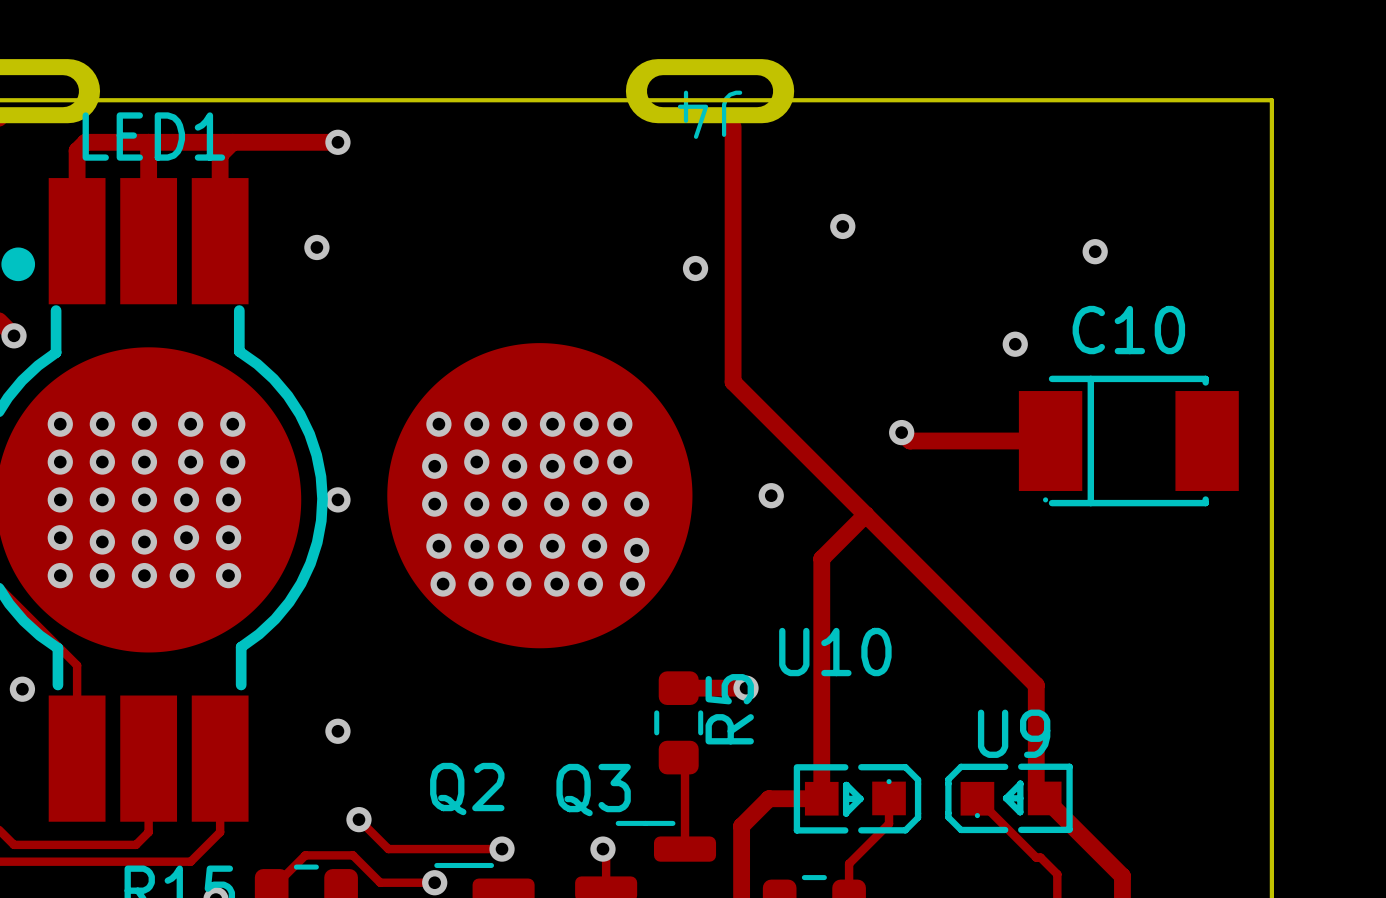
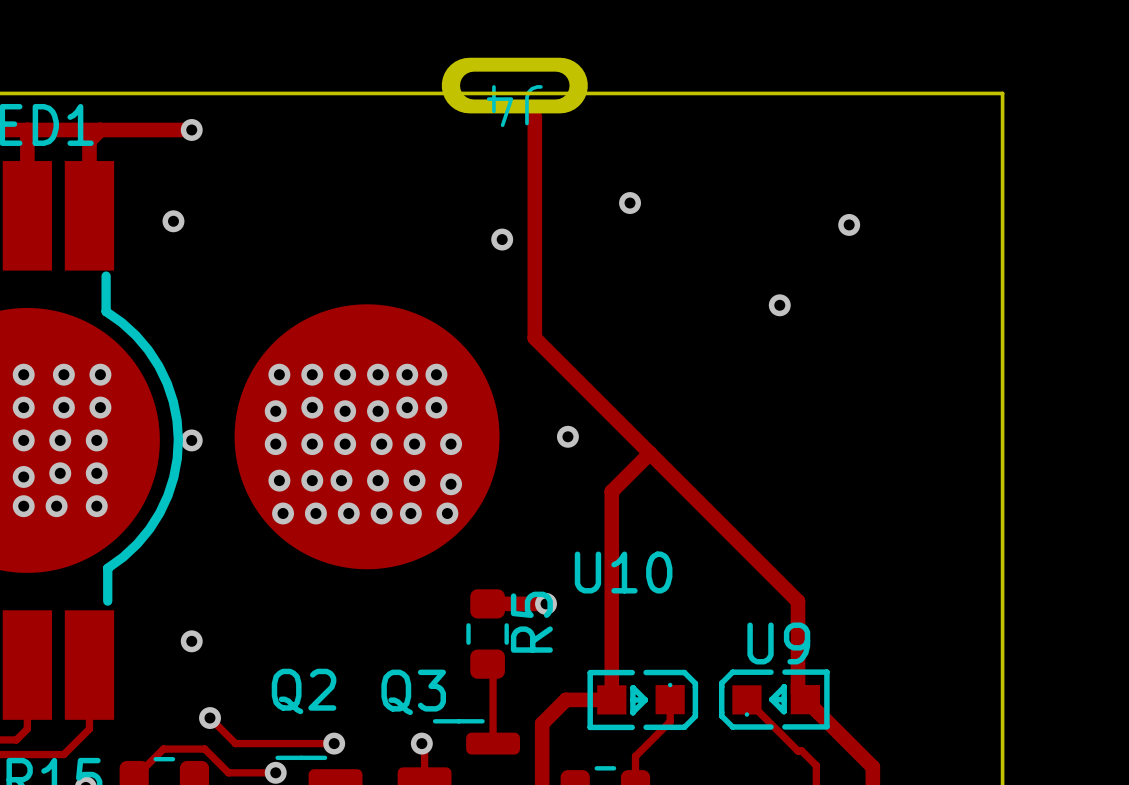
track: (901, 432) (910, 441) (1050, 441) -> none
via: (901, 432) -> none
C10: (1128, 441) -> none

